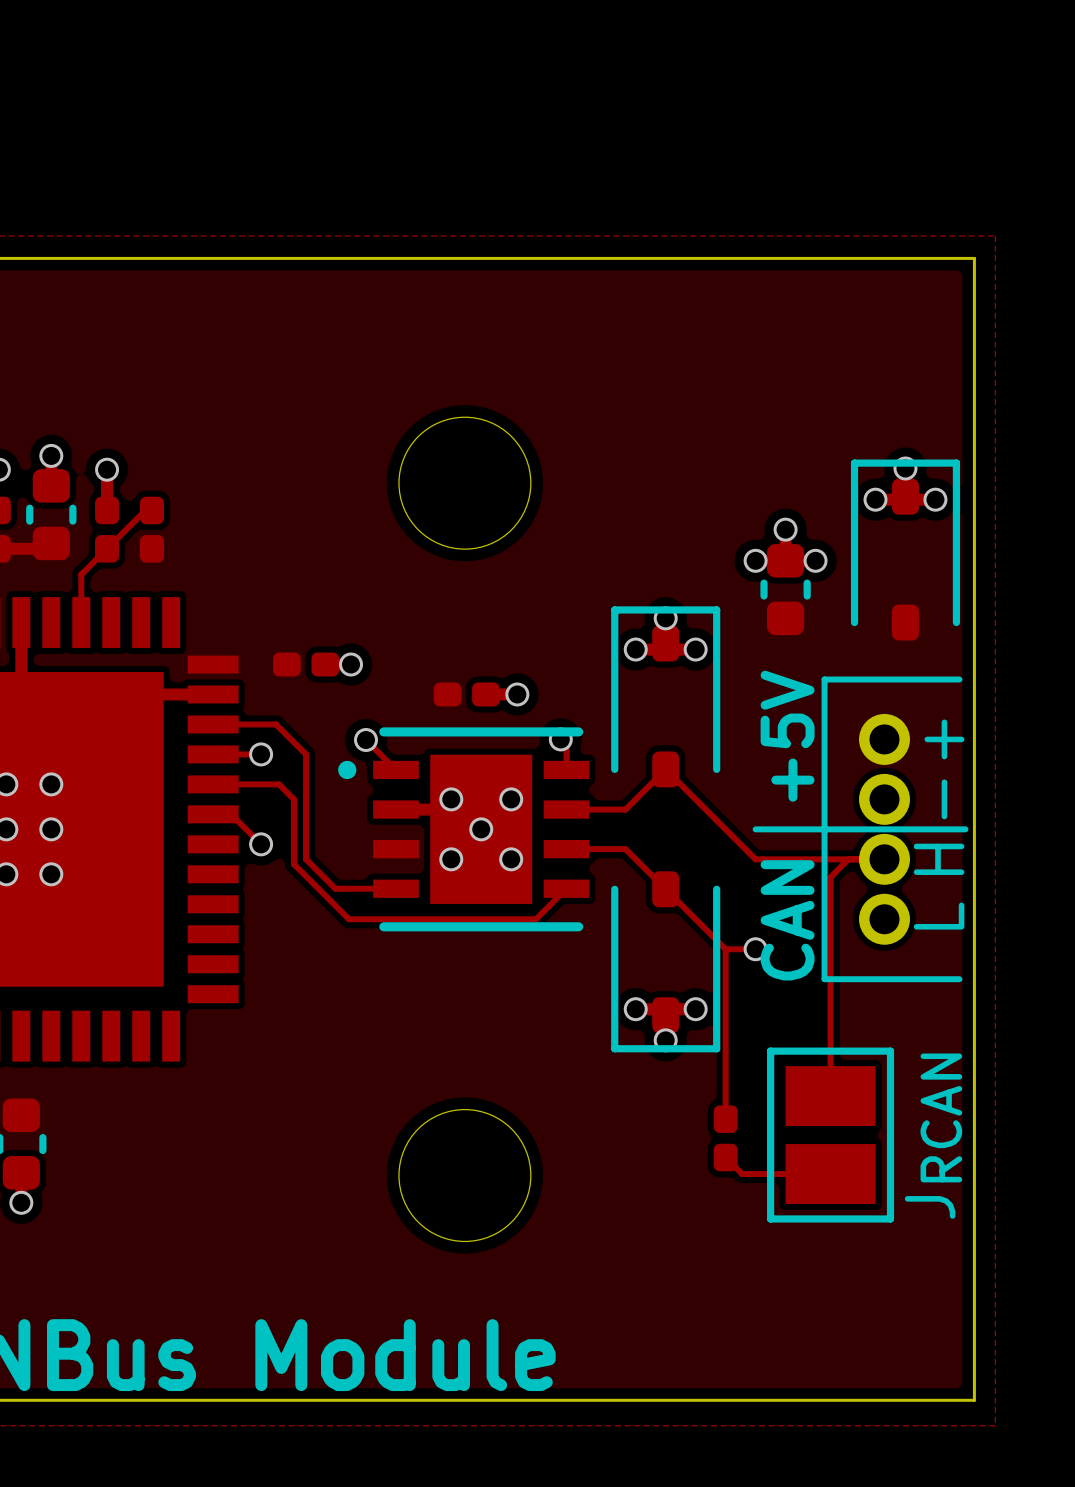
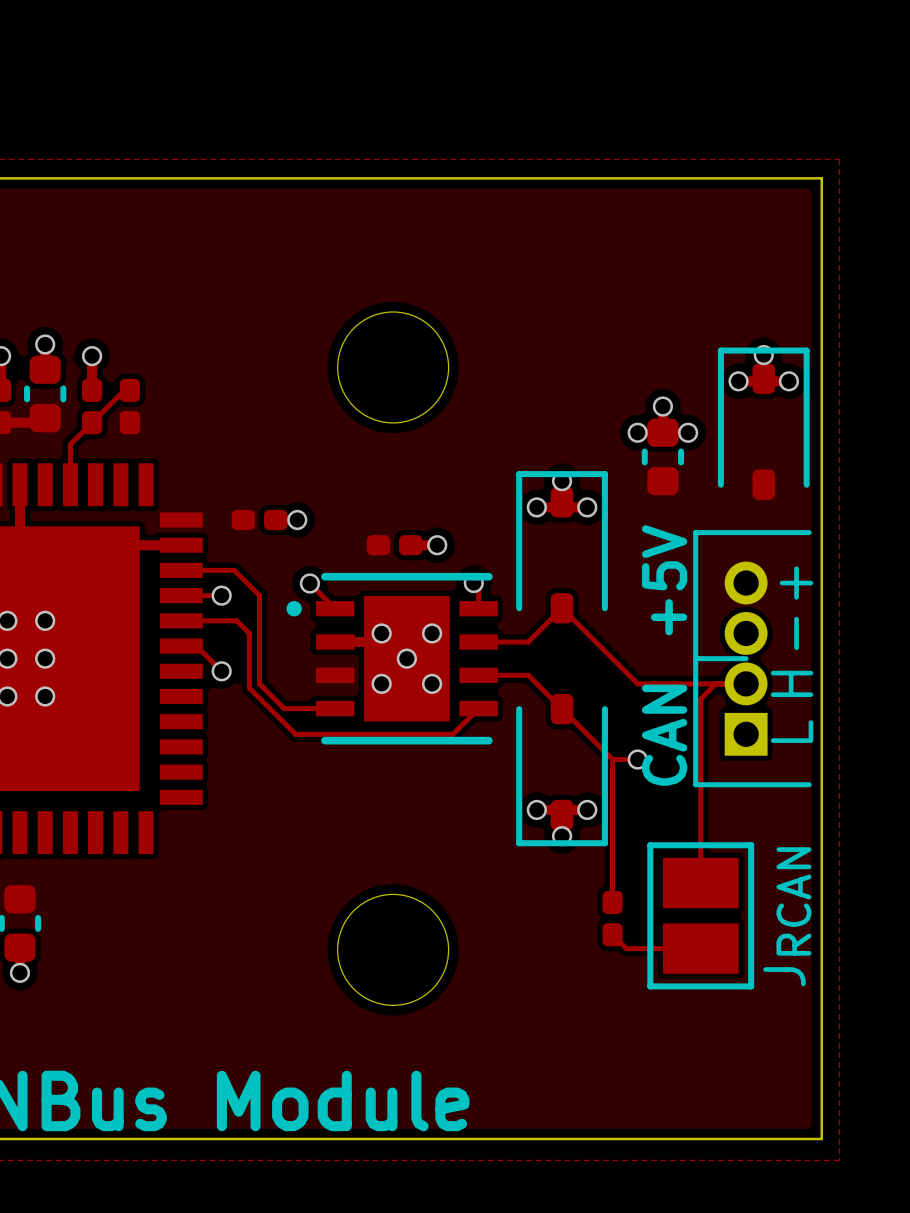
part footprint: [859, 713, 910, 945] -> [724, 561, 768, 756]
line: (755, 829) (824, 829) -> none
line: (884, 829) (965, 829) -> none

